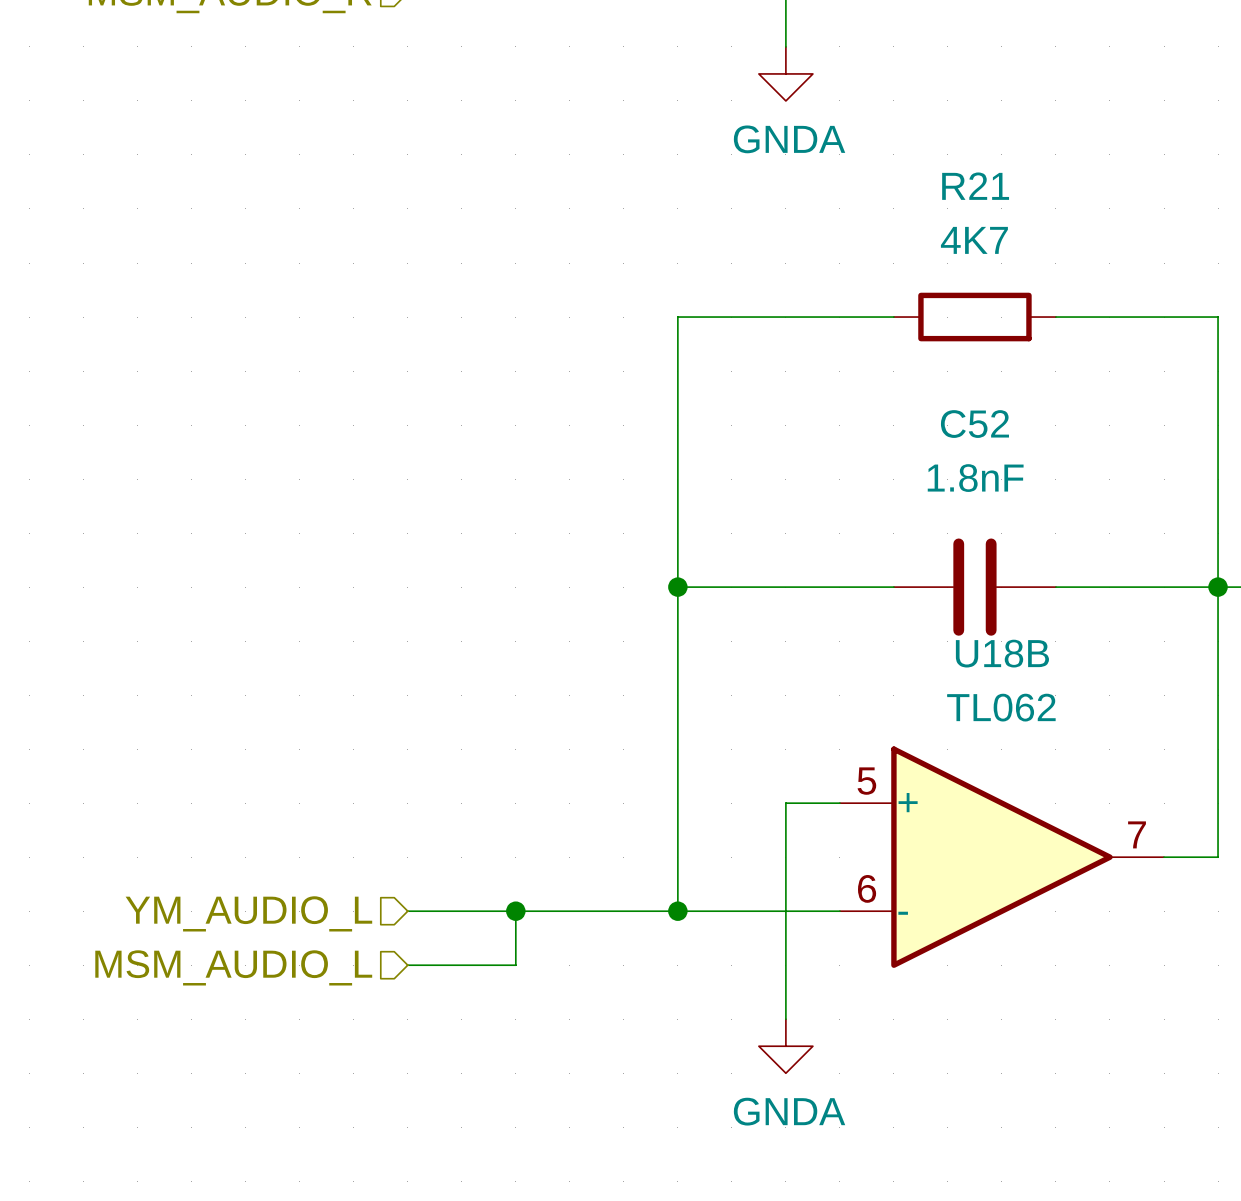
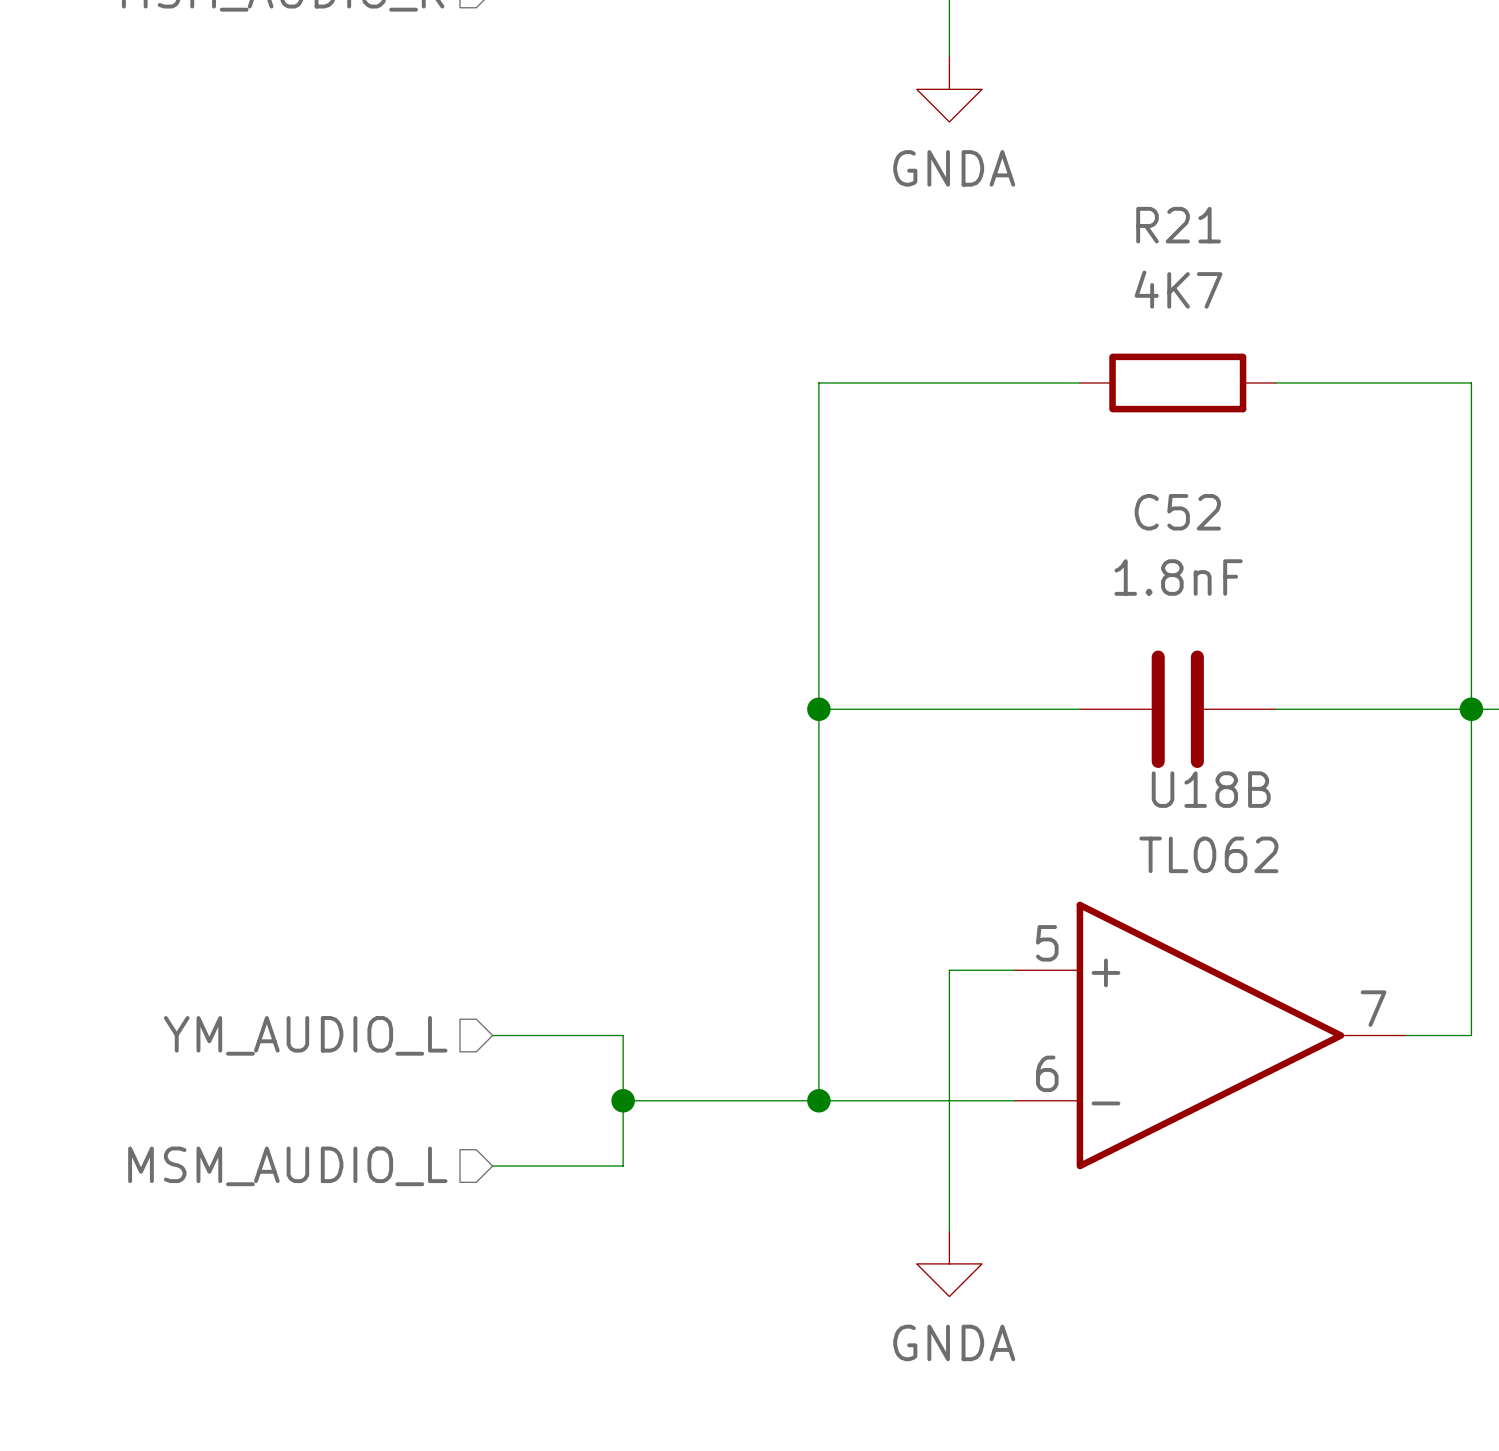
wire: (407, 911) (515, 911) -> (492, 1035) (623, 1035) (623, 1100)
hierarchical label position: YM_AUDIO_L (248, 913) -> YM_AUDIO_L (305, 1035)

